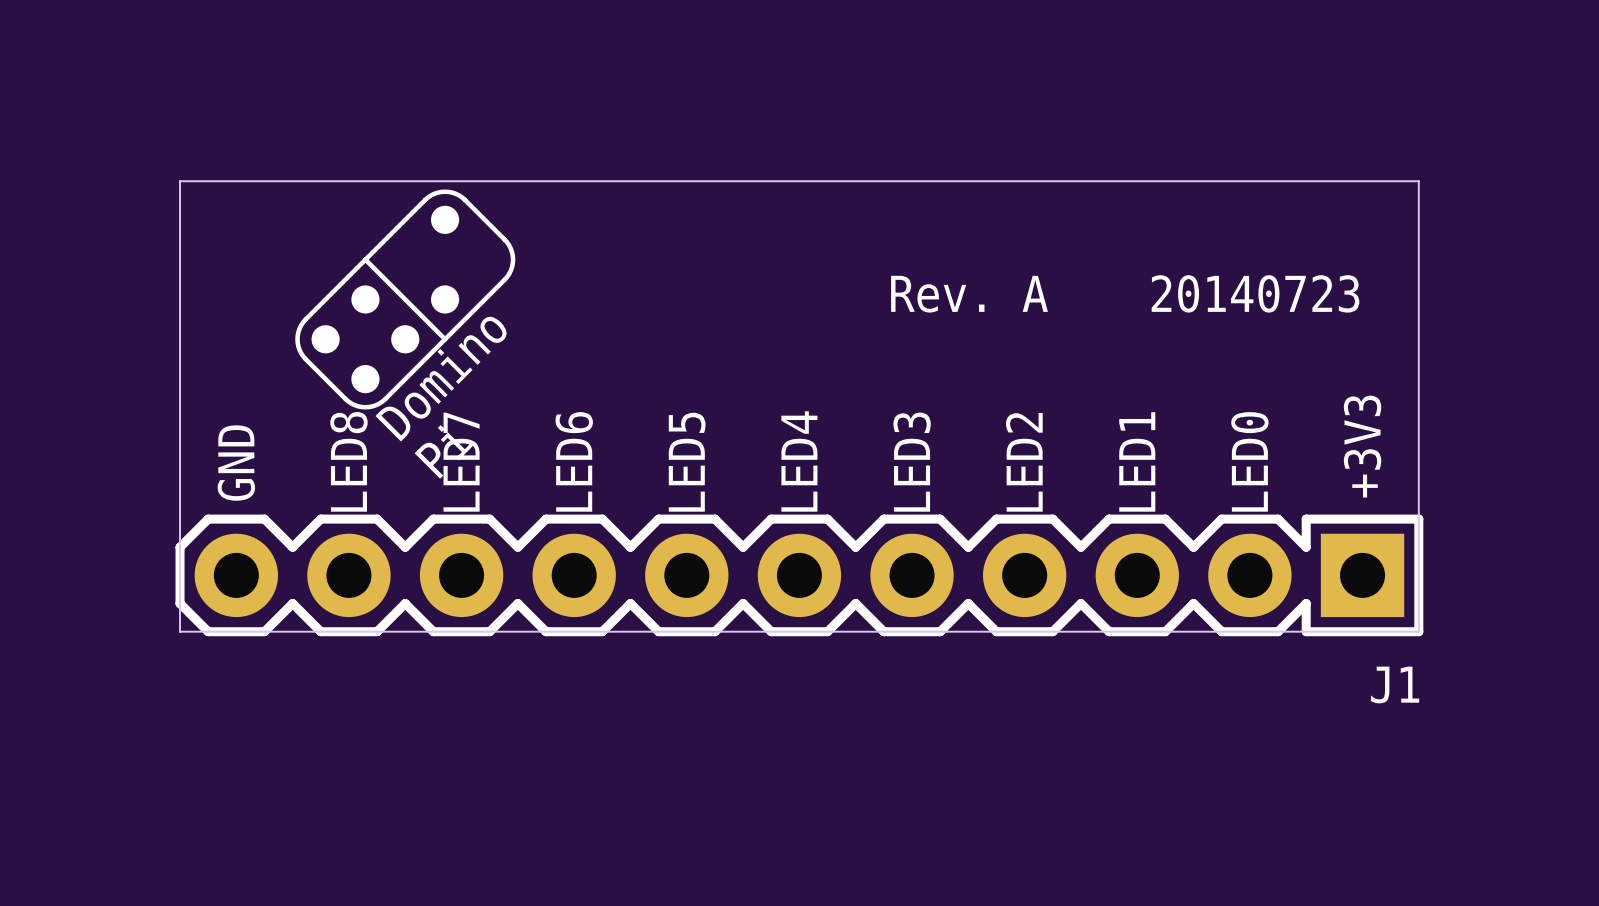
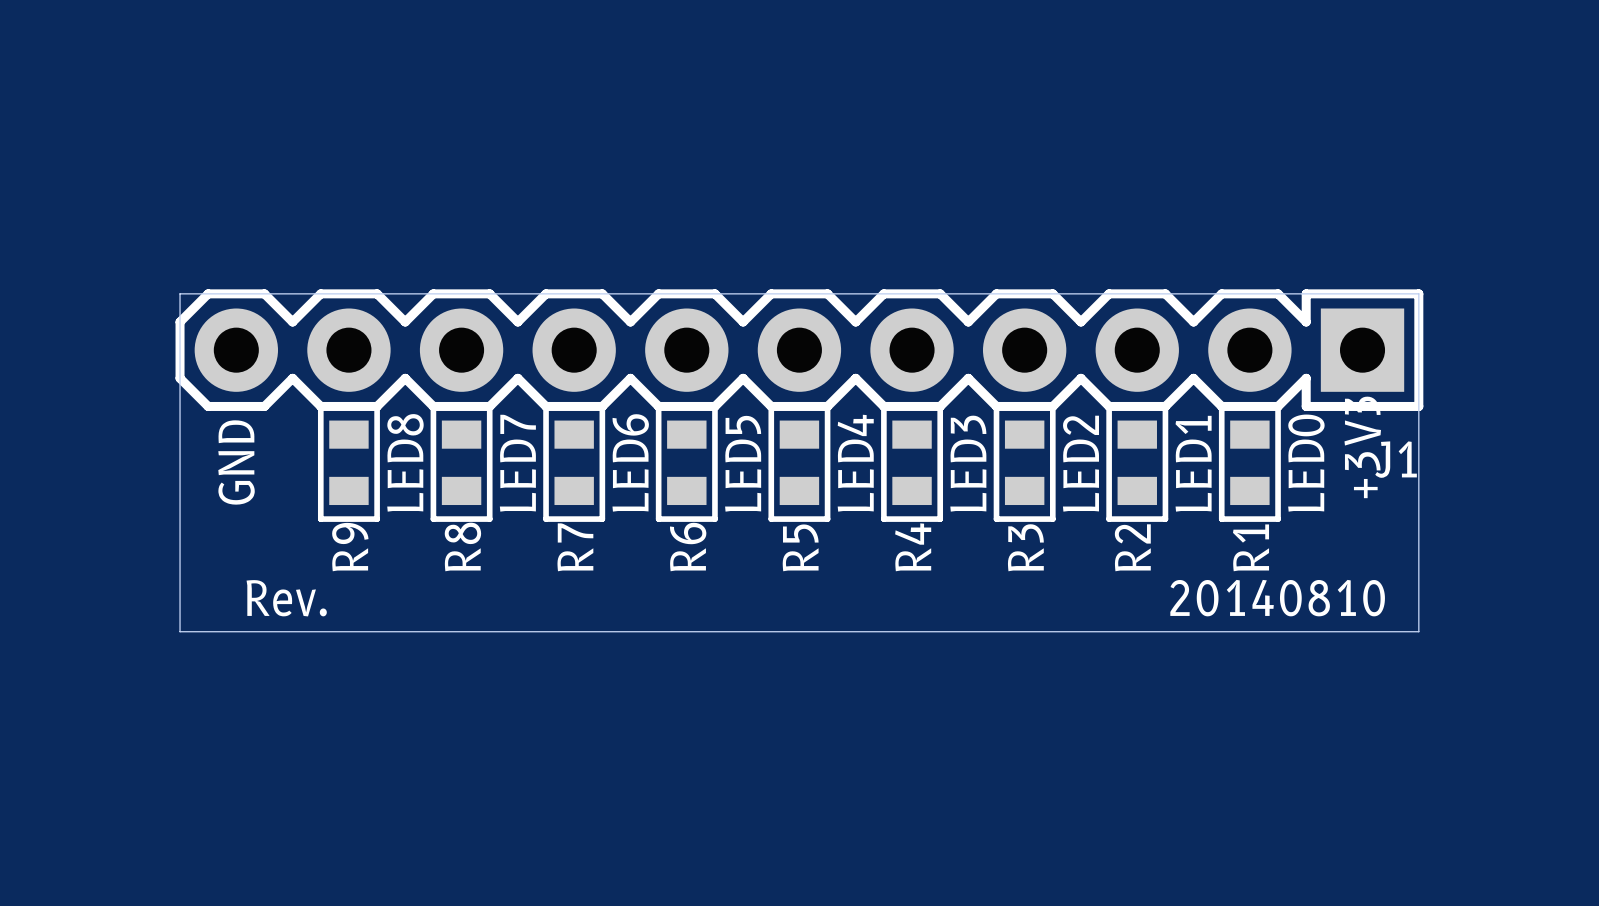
drawing: [295, 189, 516, 410] -> none
text: 20140723 (1255, 293) -> none
board edge: (1418, 293) (1418, 181) (180, 181) (180, 293) -> (1418, 293) (180, 293)
text: Rev. A (969, 294) -> none
text position: LED8 (348, 461) -> LED8 (405, 462)
text position: LED6 (574, 461) -> LED6 (630, 462)
text position: LED4 (799, 461) -> LED4 (855, 463)
text position: LED1 (1137, 461) -> LED1 (1193, 463)
text position: LED0 (1249, 461) -> LED0 (1306, 463)
R9: none -> (348, 462)
text position: LED7 (461, 462) -> LED7 (517, 463)
R8: none -> (461, 462)
R7: none -> (574, 462)
R6: none -> (686, 462)
text position: LED5 (687, 462) -> LED5 (743, 463)
R5: none -> (799, 462)
text position: LED3 (912, 462) -> LED3 (968, 463)
R4: none -> (912, 462)
text position: LED2 (1024, 462) -> LED2 (1080, 463)
R3: none -> (1024, 462)
R2: none -> (1137, 462)
R1: none -> (1249, 462)
J1 position: (799, 575) -> (799, 350)
text: none -> 20140810 (1277, 598)
text: none -> Rev. (286, 598)

